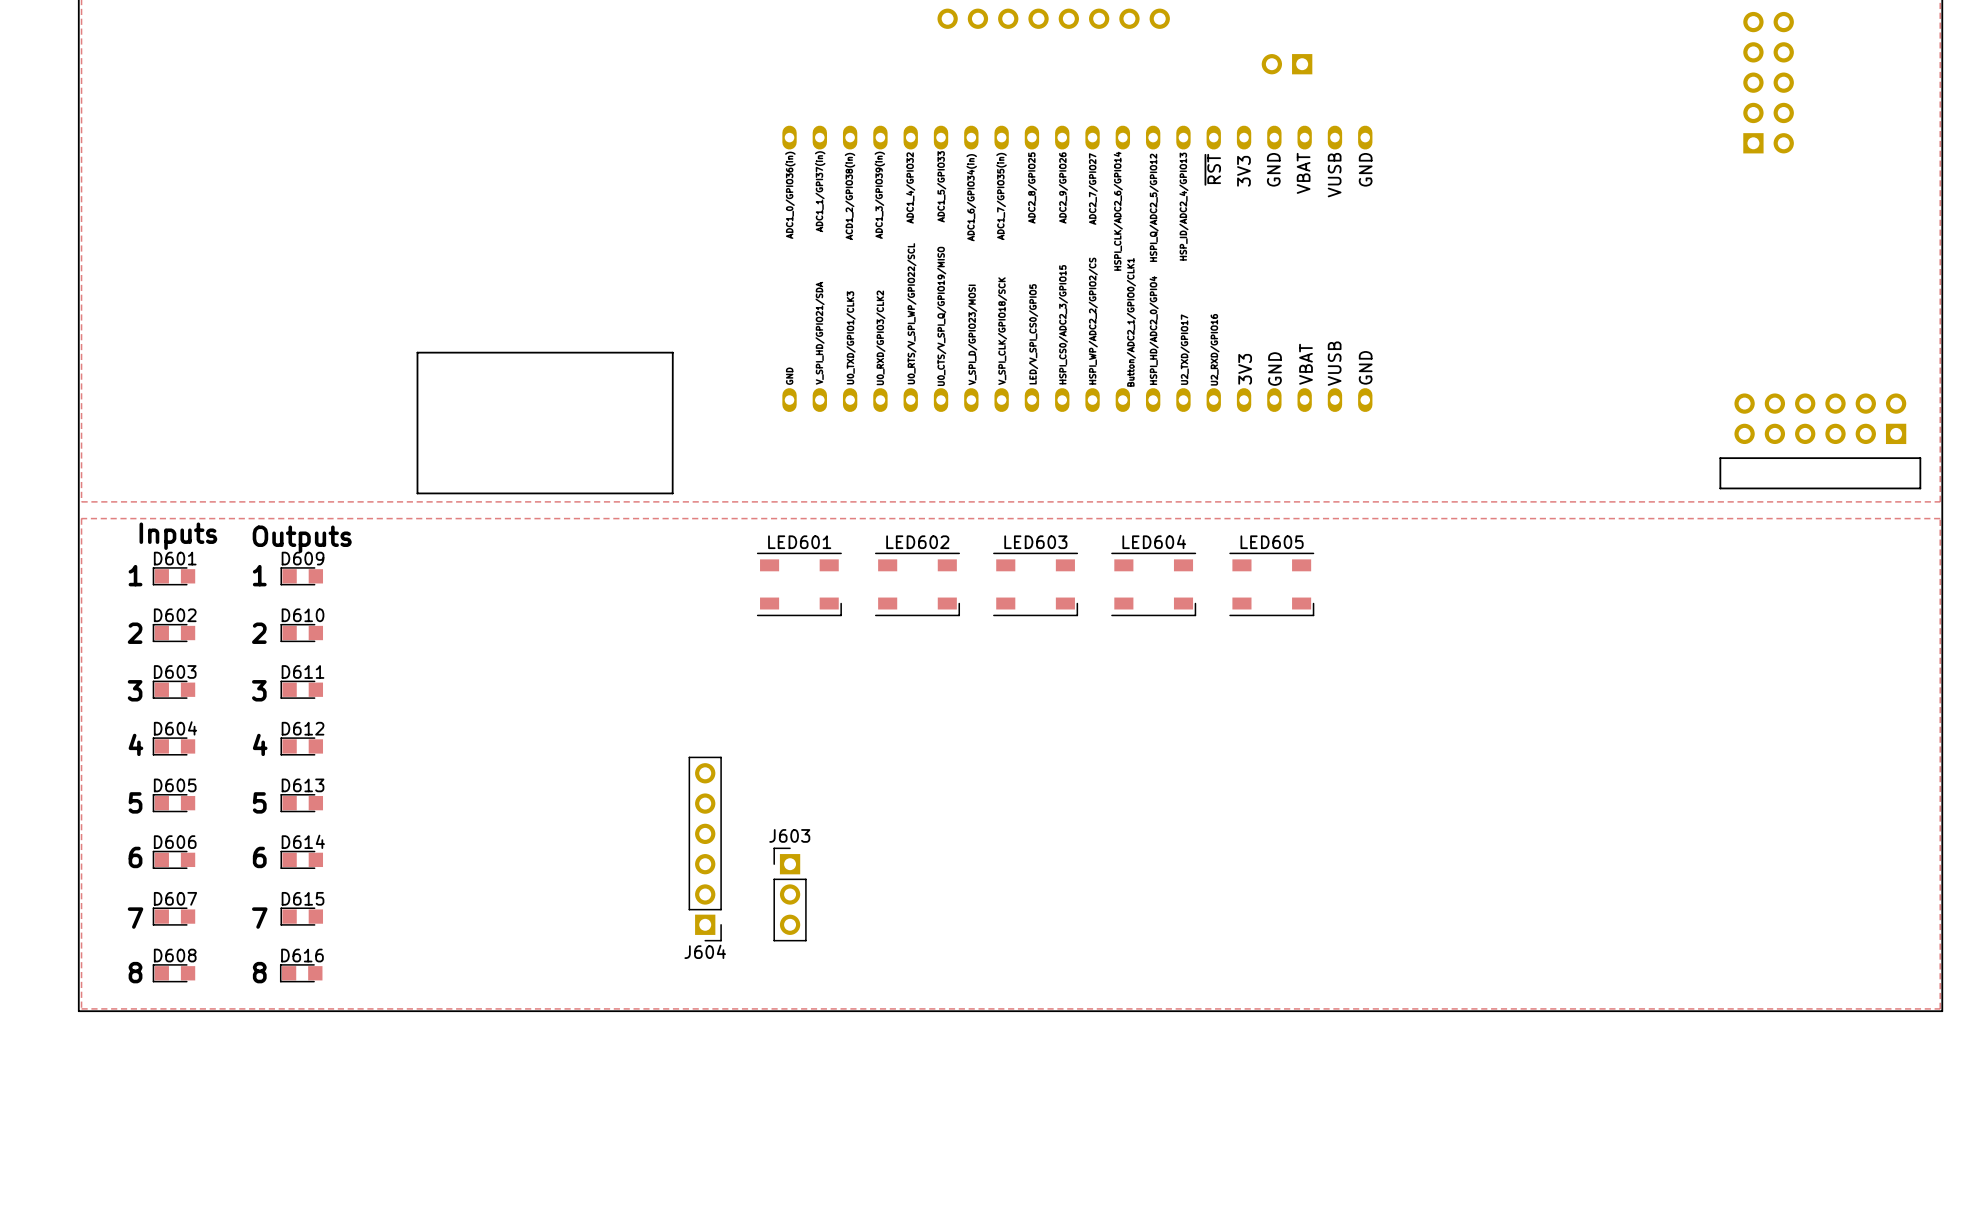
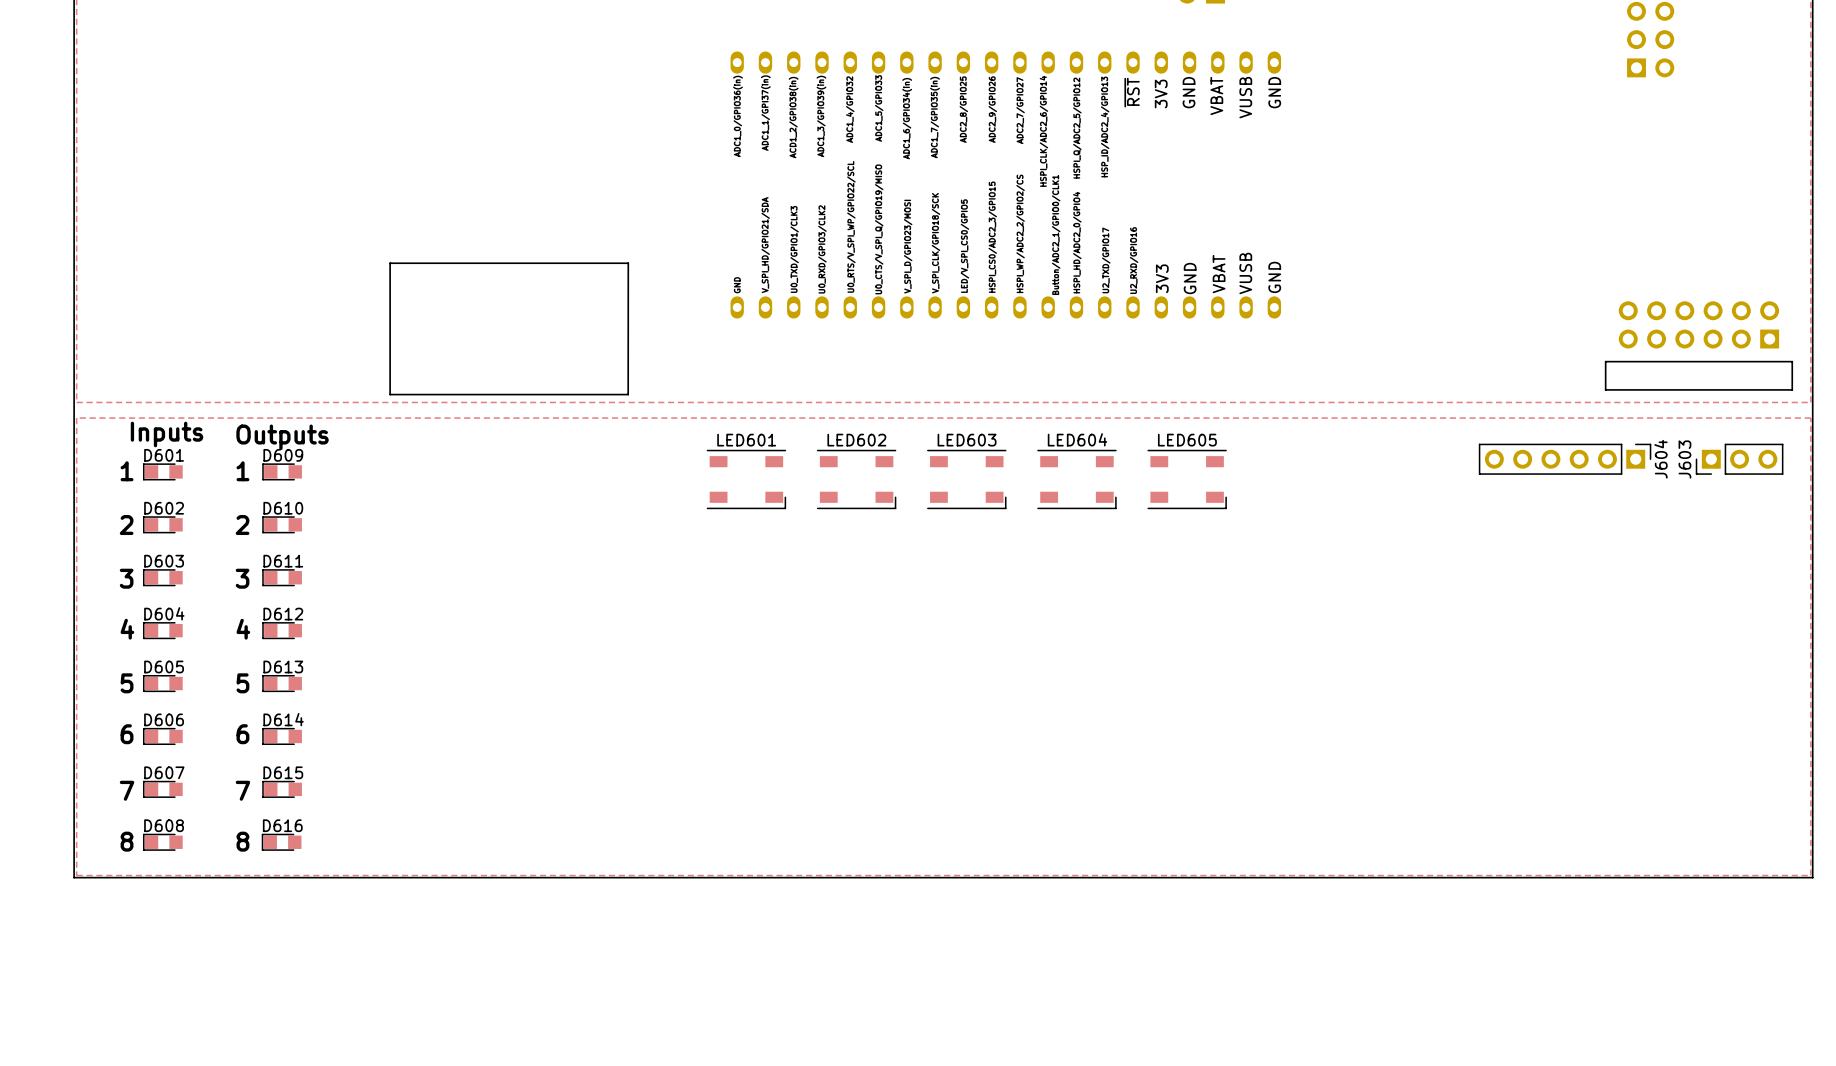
J604 rotation: 0° (705, 849) -> 90° counterclockwise (1565, 459)
J604 position: (705, 849) -> (1565, 459)
J603 rotation: 0° (790, 894) -> 90° counterclockwise (1739, 459)
J603 position: (790, 894) -> (1739, 459)

